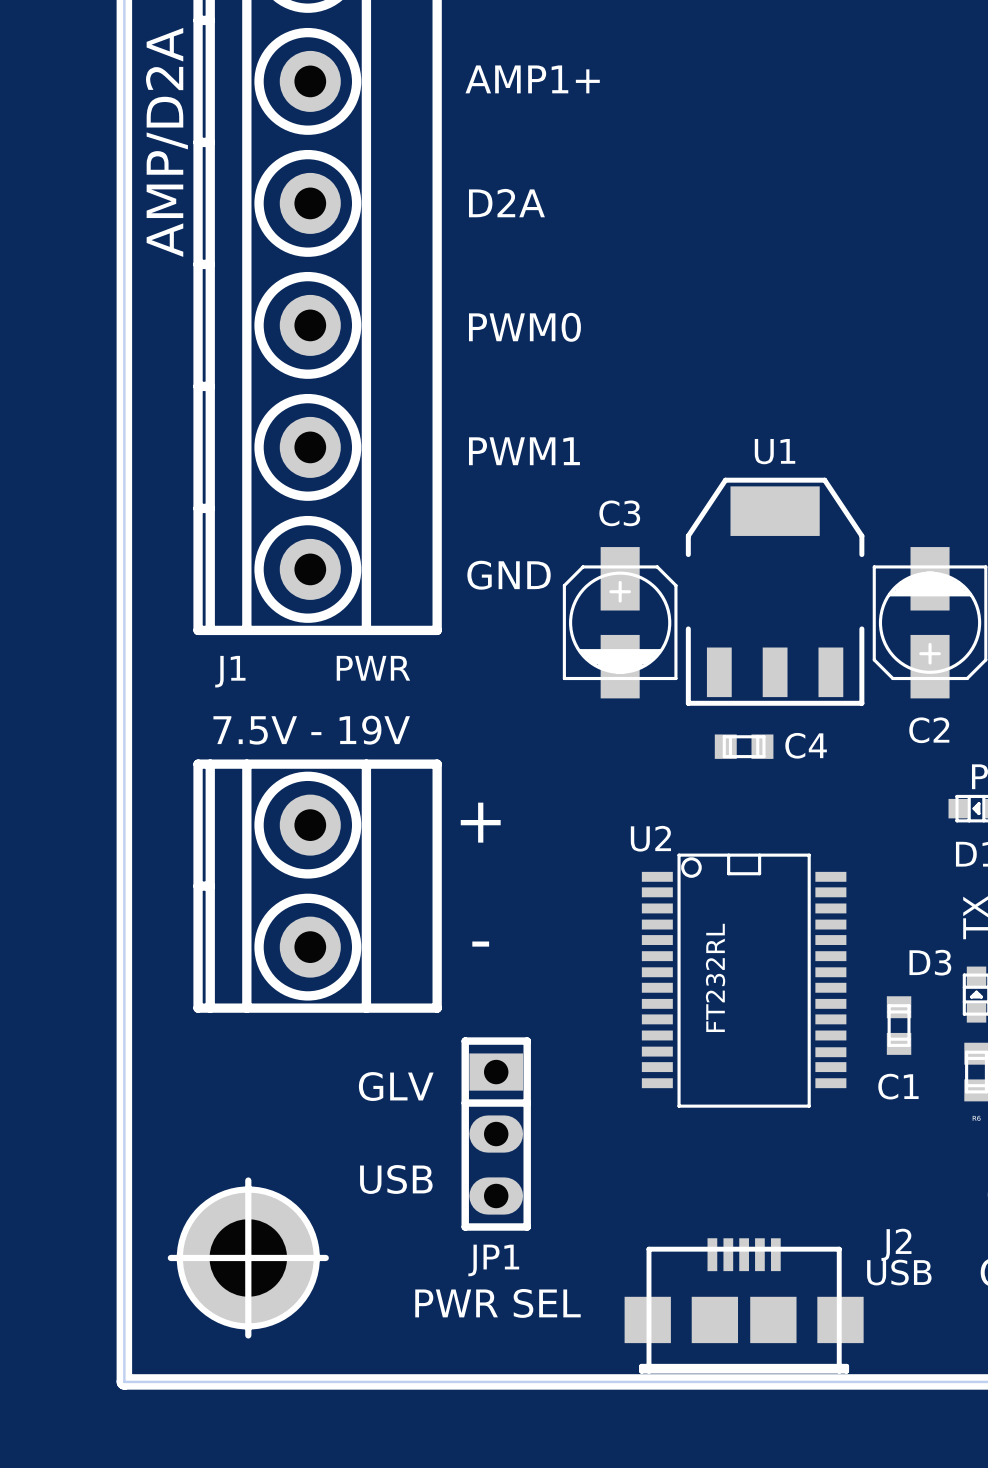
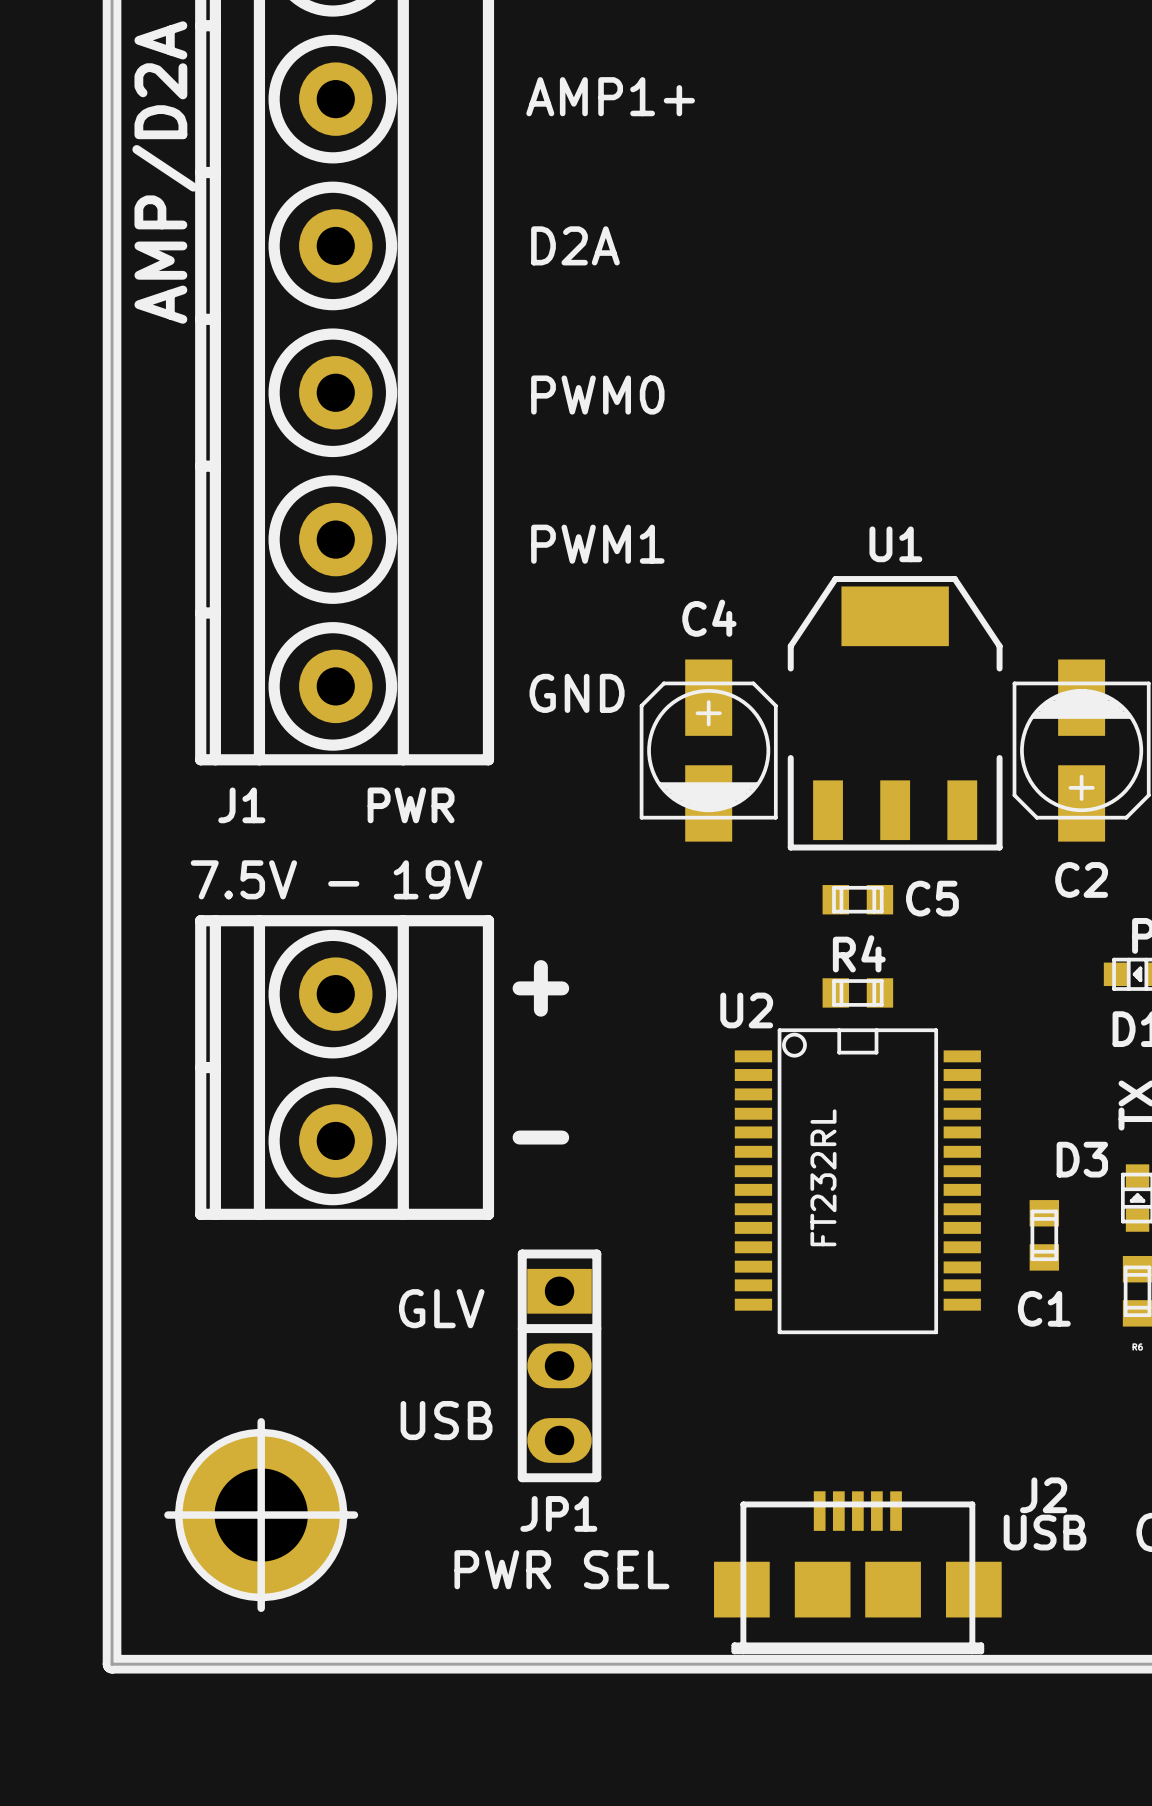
C3 name: C3 (619, 513) -> C4 (709, 618)
C4 name: C4 (806, 745) -> C5 (932, 898)
R4: none -> (857, 992)

